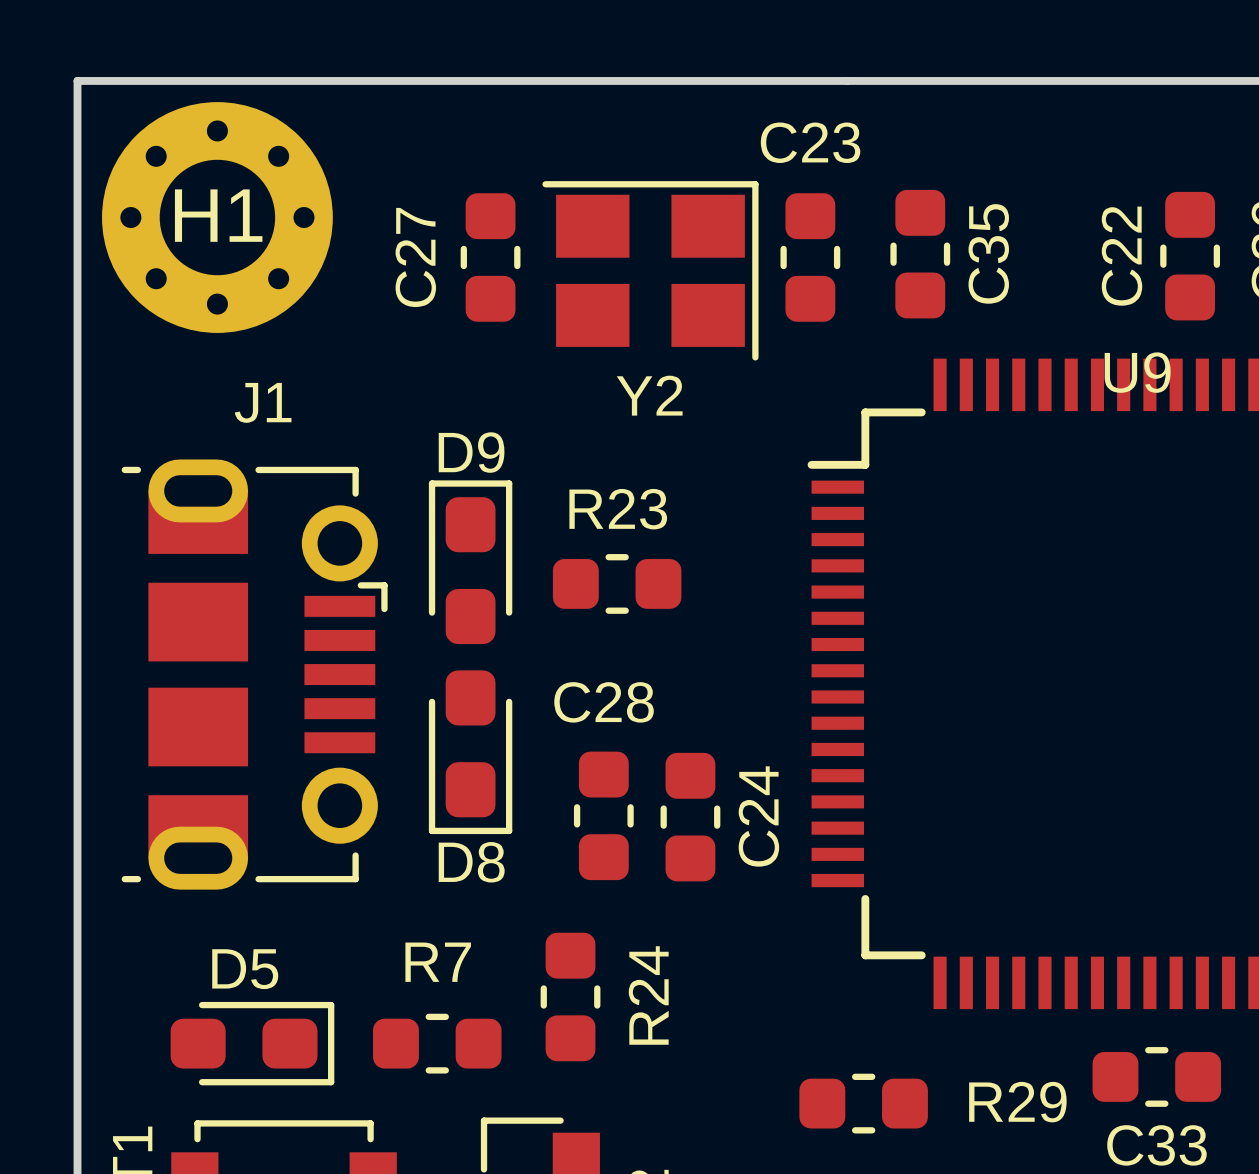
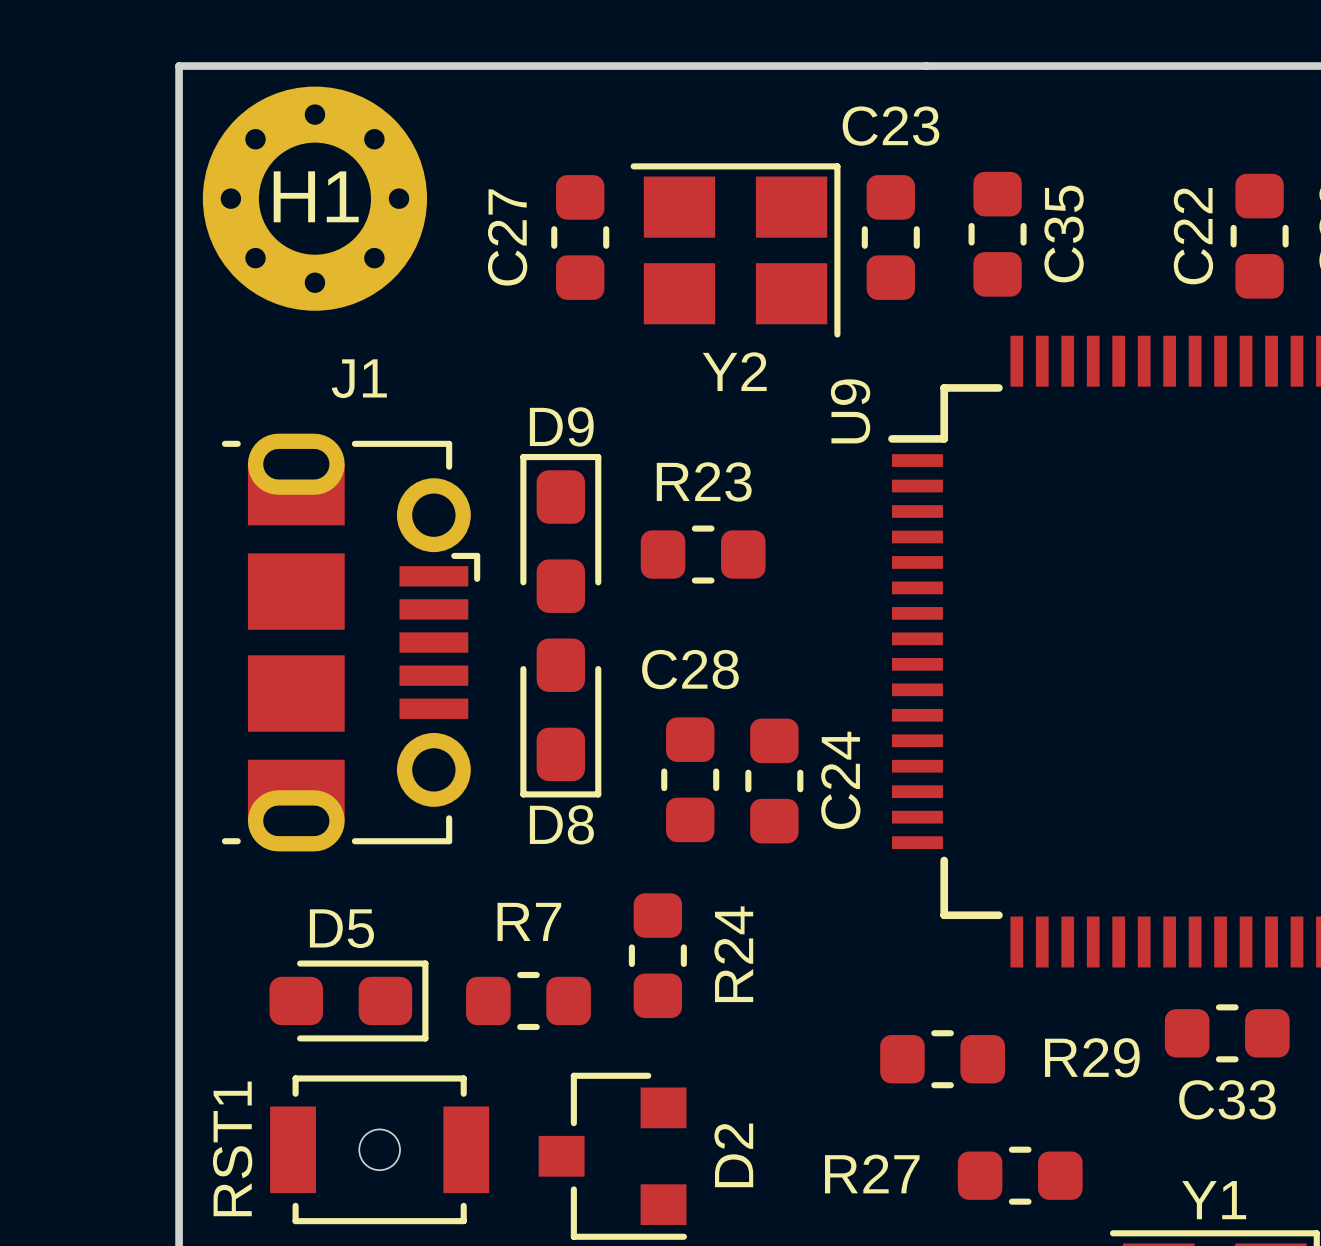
U9 name rotation: 0° (1137, 372) -> 90° counterclockwise (850, 411)
U9 name position: U9 (1137, 372) -> U9 (850, 411)

